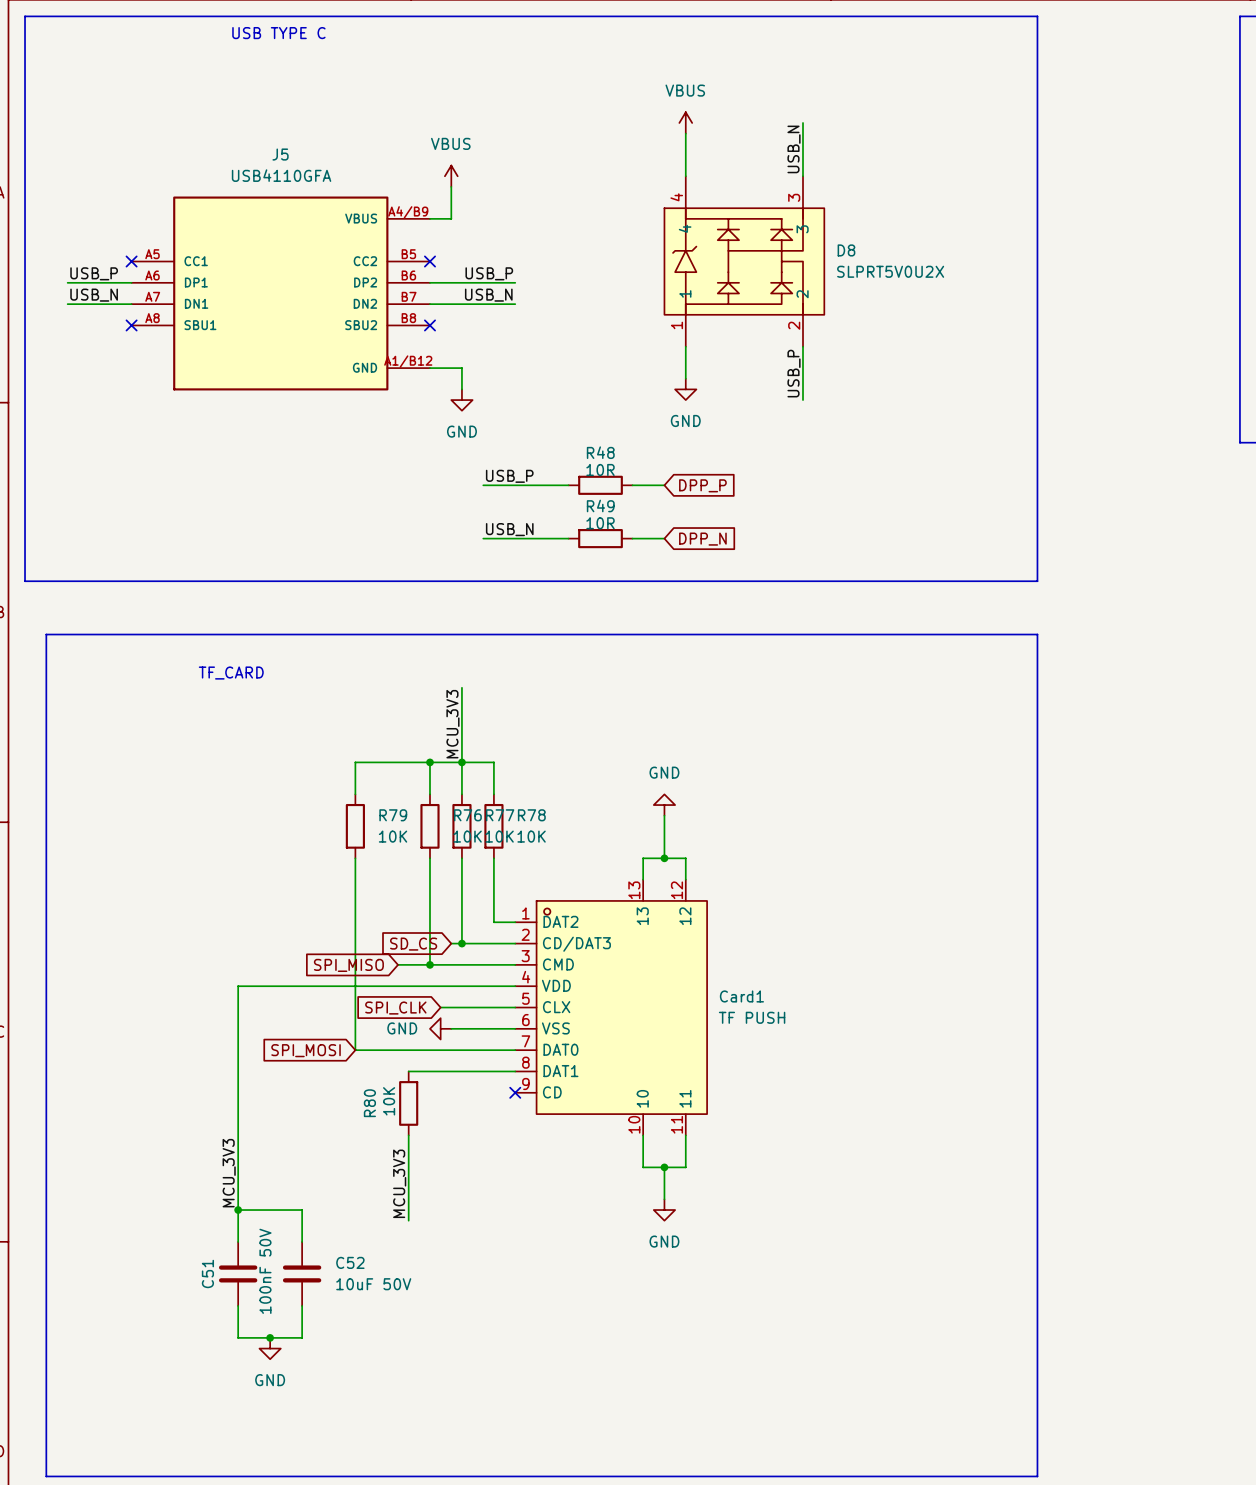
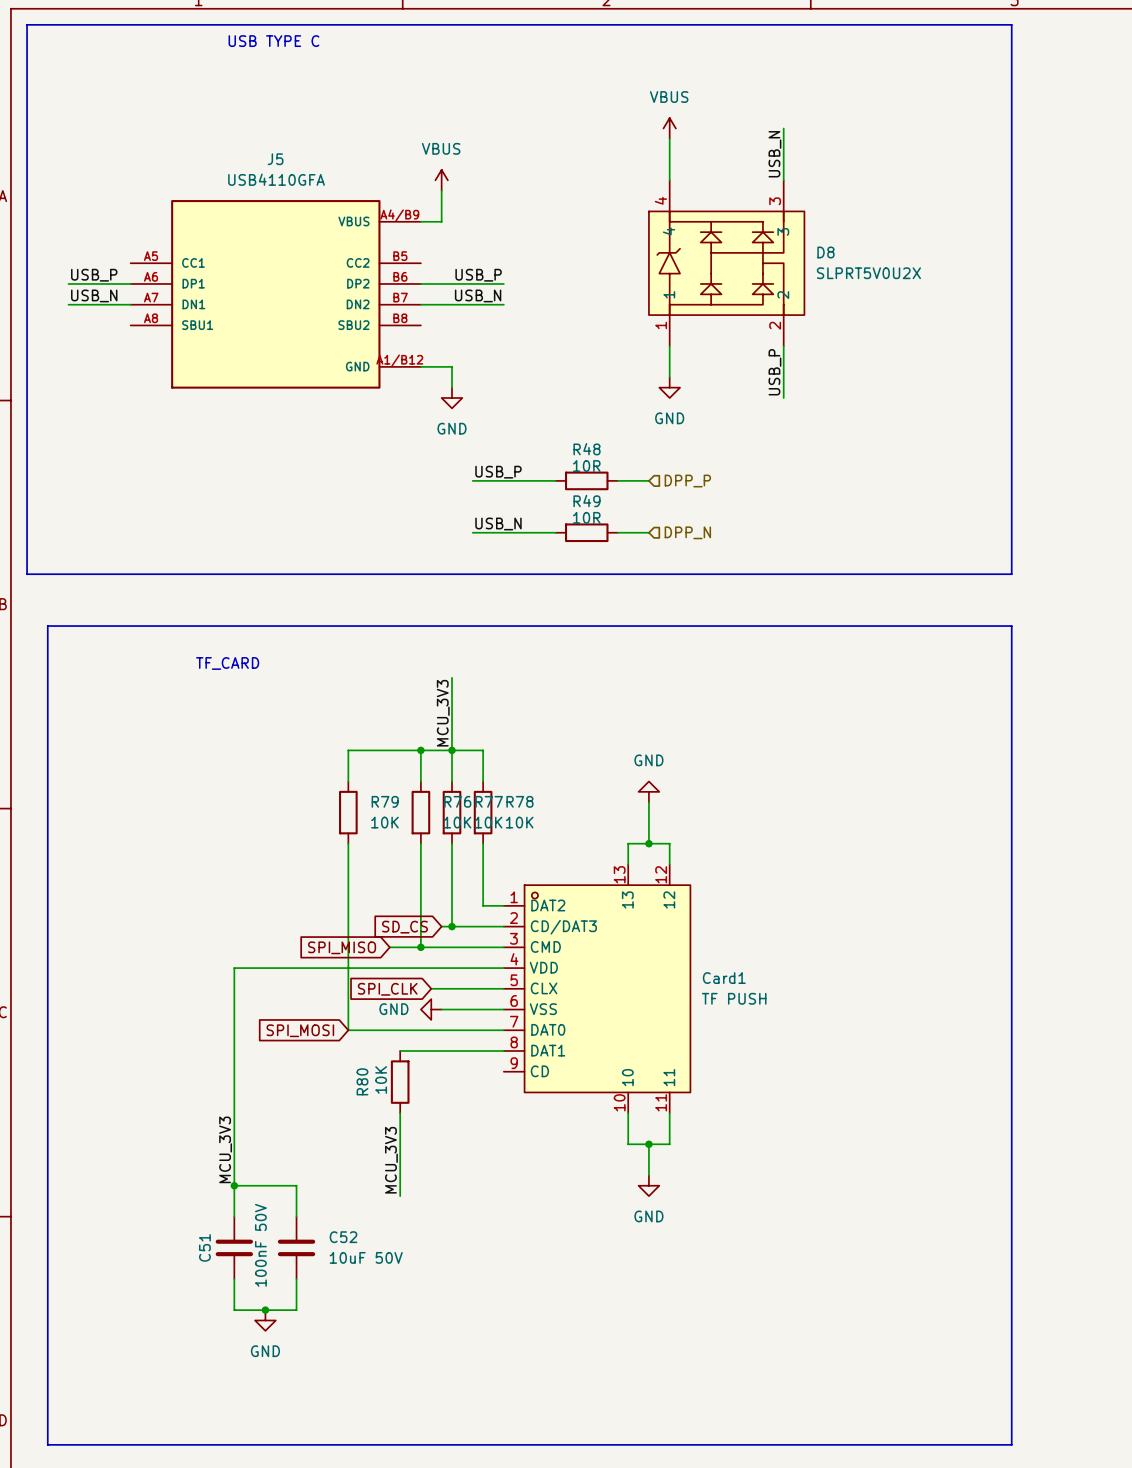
no-connect mark: (131, 261) -> none
no-connect mark: (429, 261) -> none
no-connect mark: (131, 325) -> none
no-connect mark: (429, 325) -> none
global label: DPP_P (702, 485) -> none
hierarchical label: none -> DPP_P (687, 481)
hierarchical label: none -> DPP_N (687, 532)
global label: DPP_N (702, 539) -> none
no-connect mark: (515, 1092) -> none

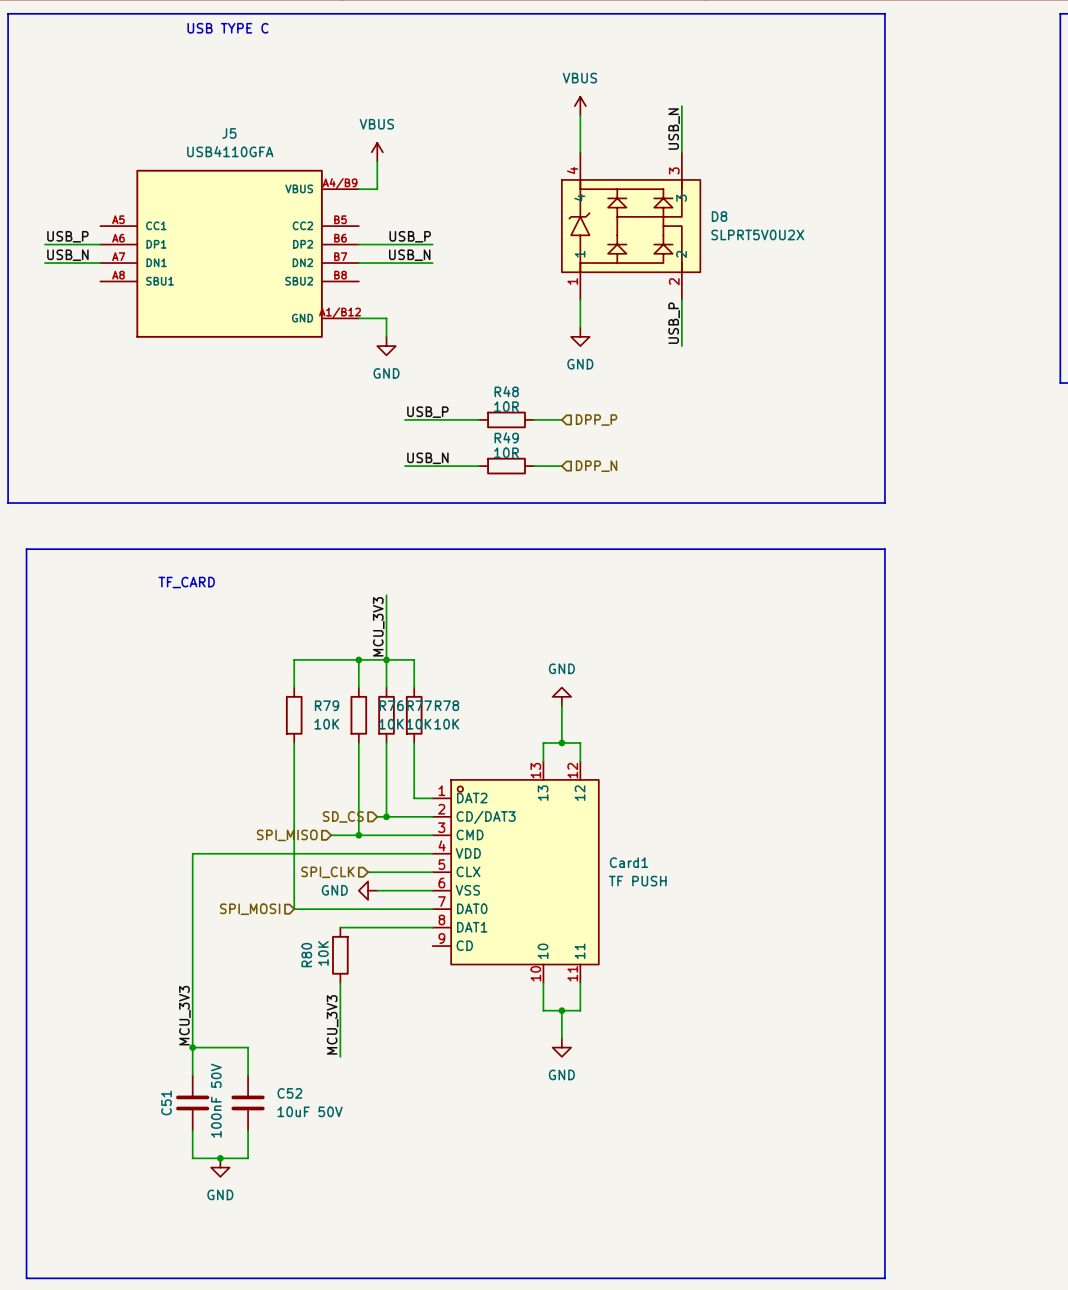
hierarchical label: none -> SD_CS (343, 816)
global label: SD_CS (404, 927) -> none
hierarchical label: none -> SPI_MISO (287, 835)
global label: SPI_MISO (342, 947) -> none
hierarchical label: none -> SPI_CLK (327, 872)
global label: SPI_CLK (387, 989) -> none
hierarchical label: none -> SPI_MOSI (250, 909)
global label: SPI_MOSI (300, 1030) -> none

